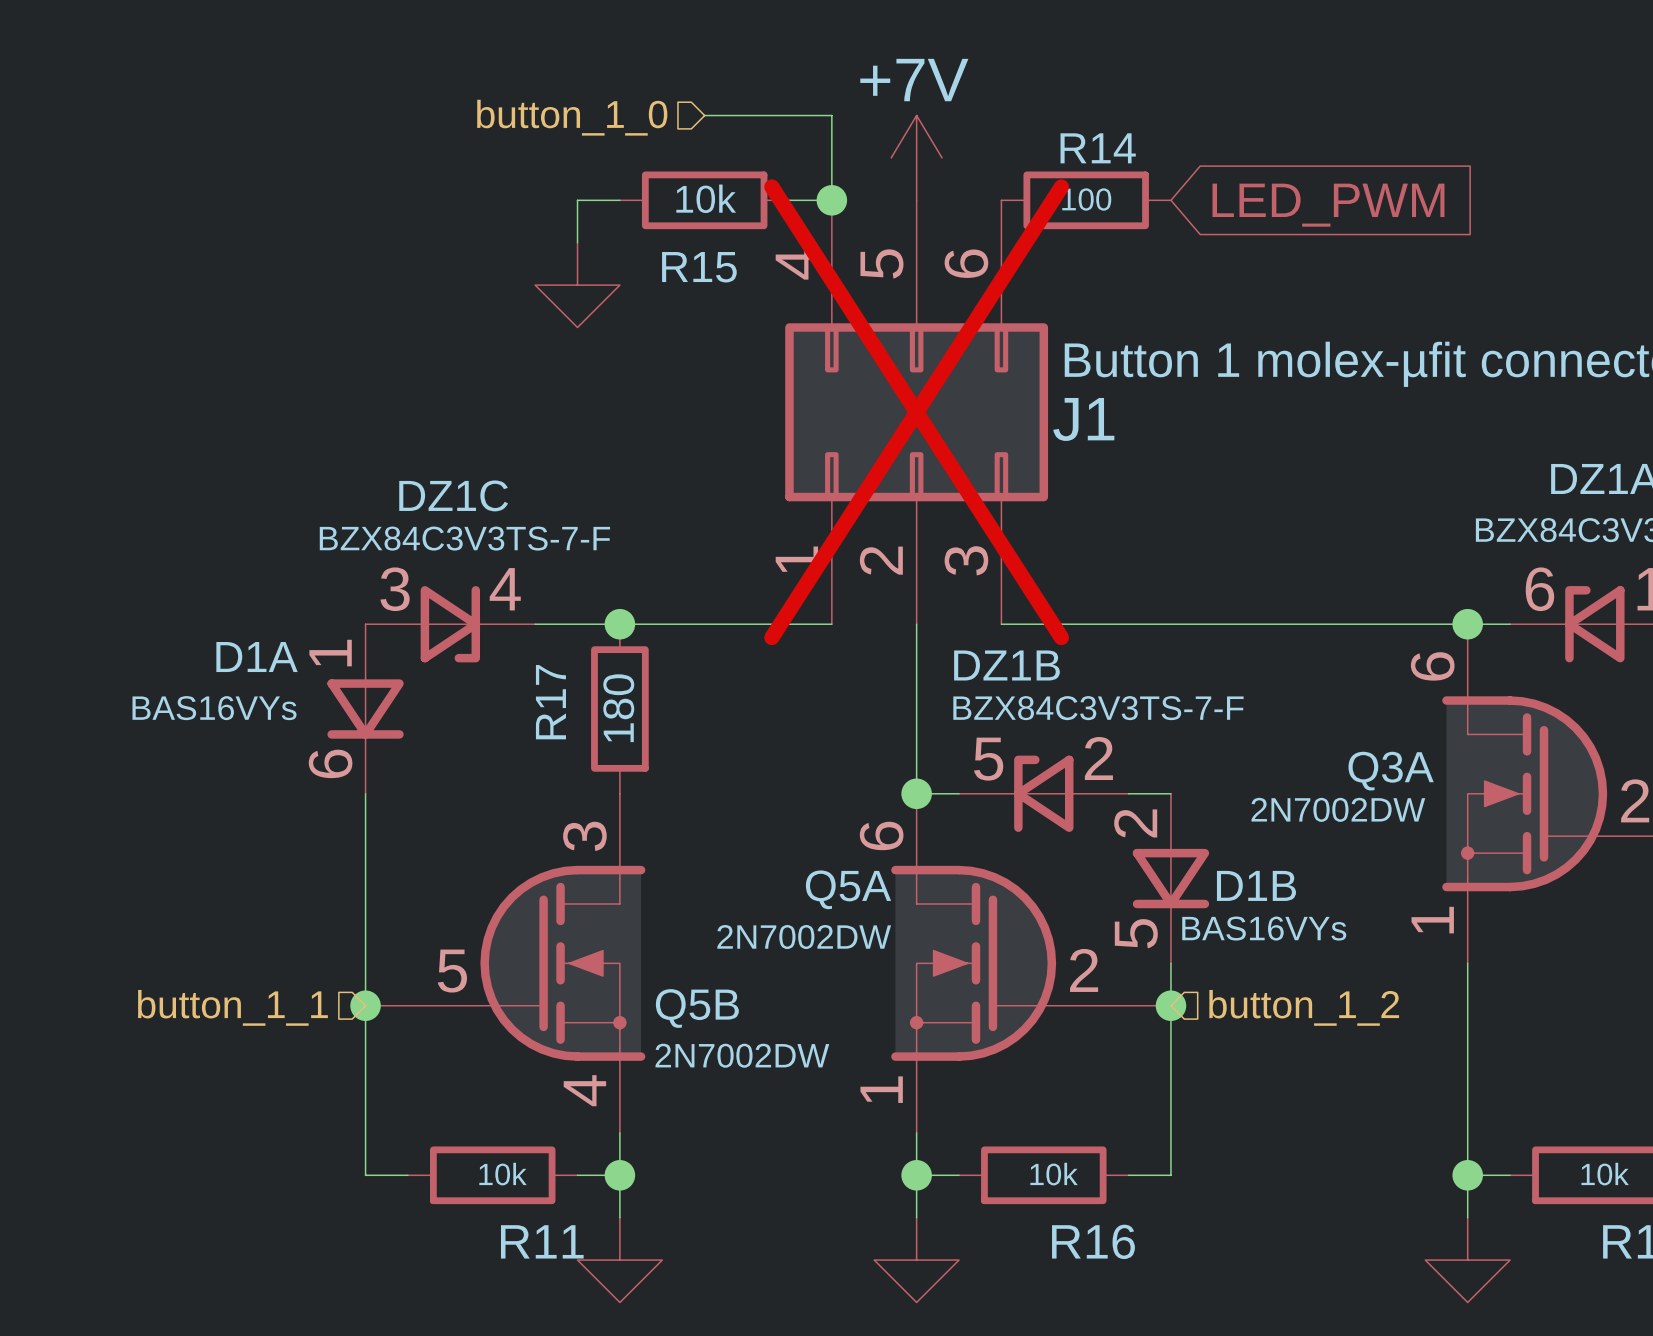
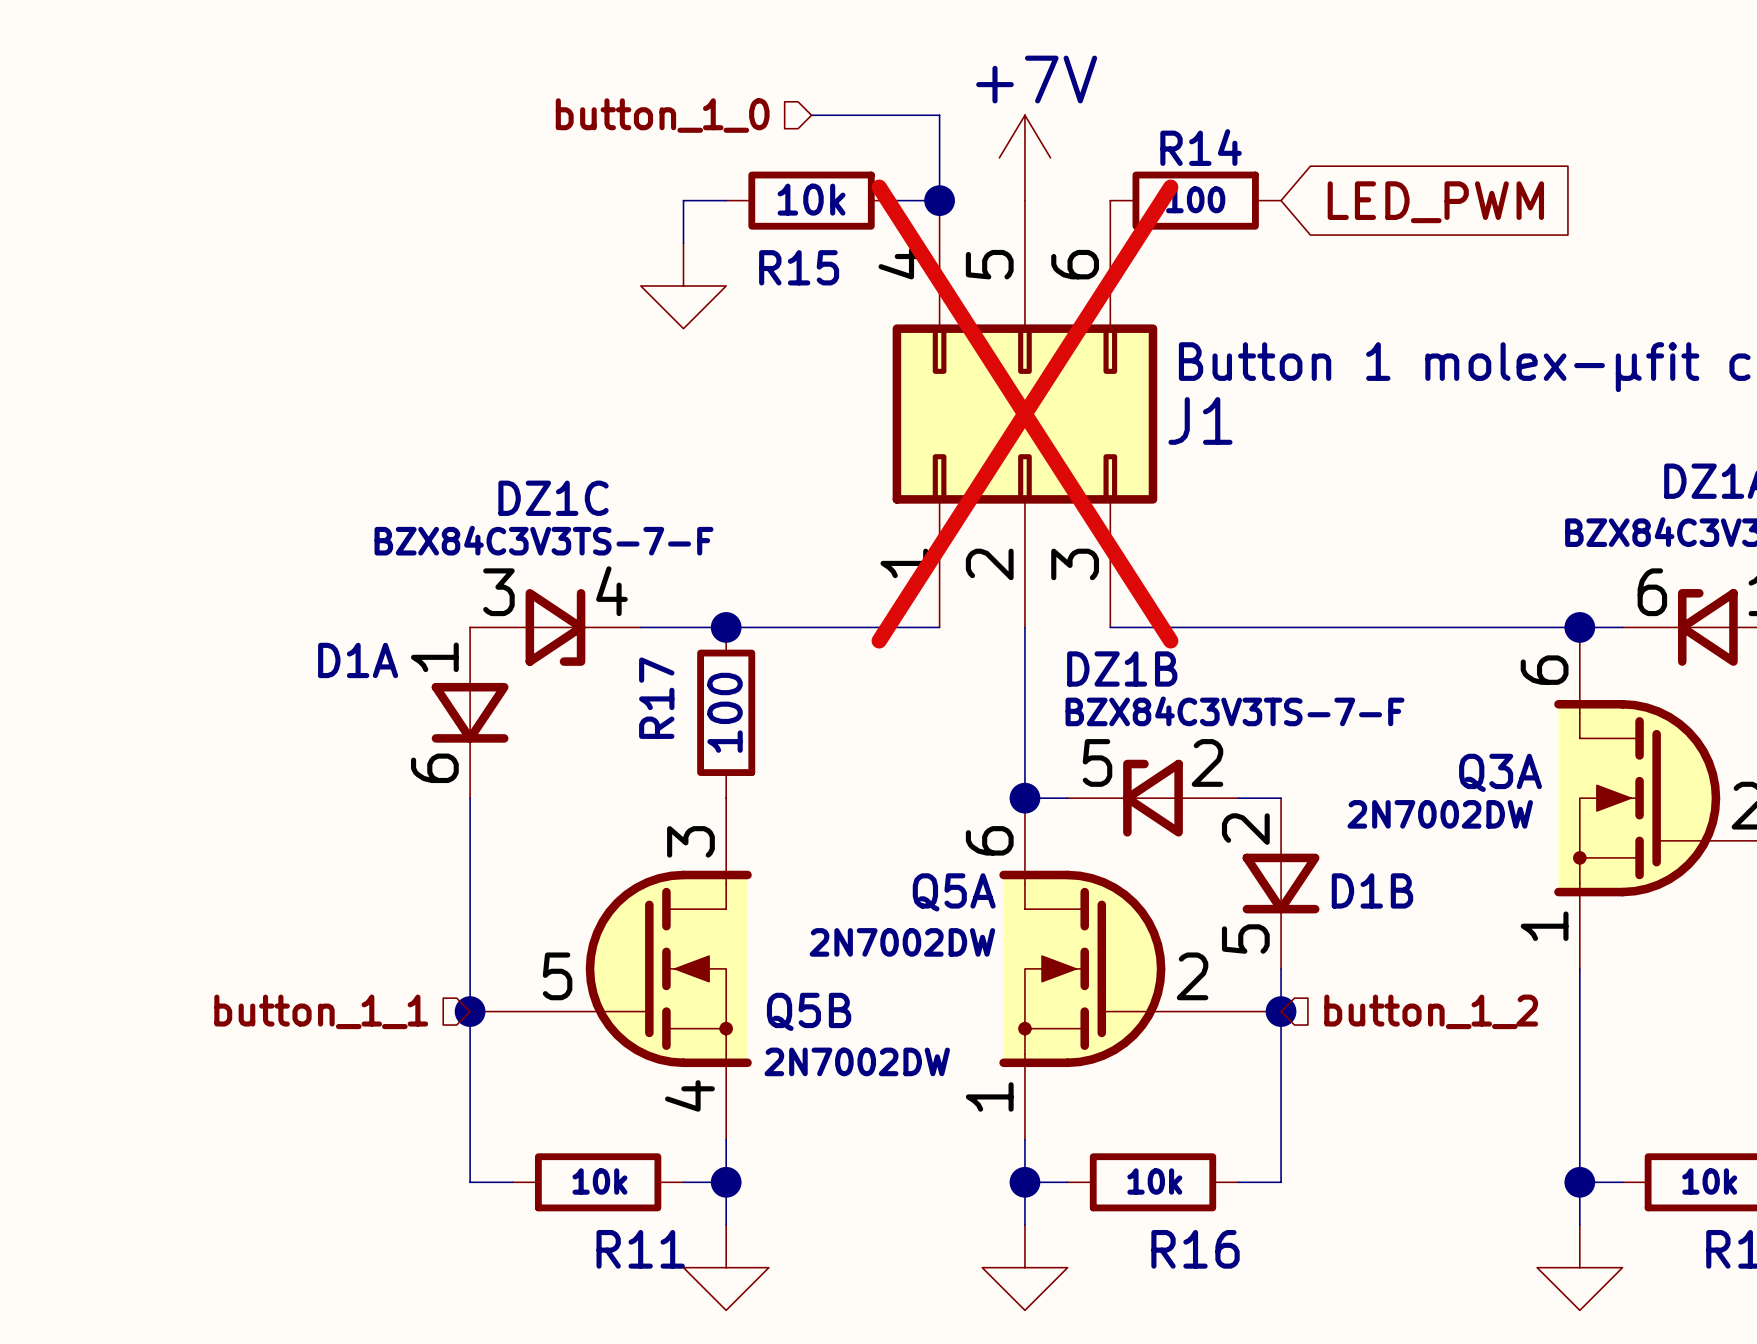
D1A value: BAS16VYs (214, 708) -> none
R17 value: 180 (618, 708) -> 100 (725, 712)
D1B value: BAS16VYs (1264, 928) -> none

